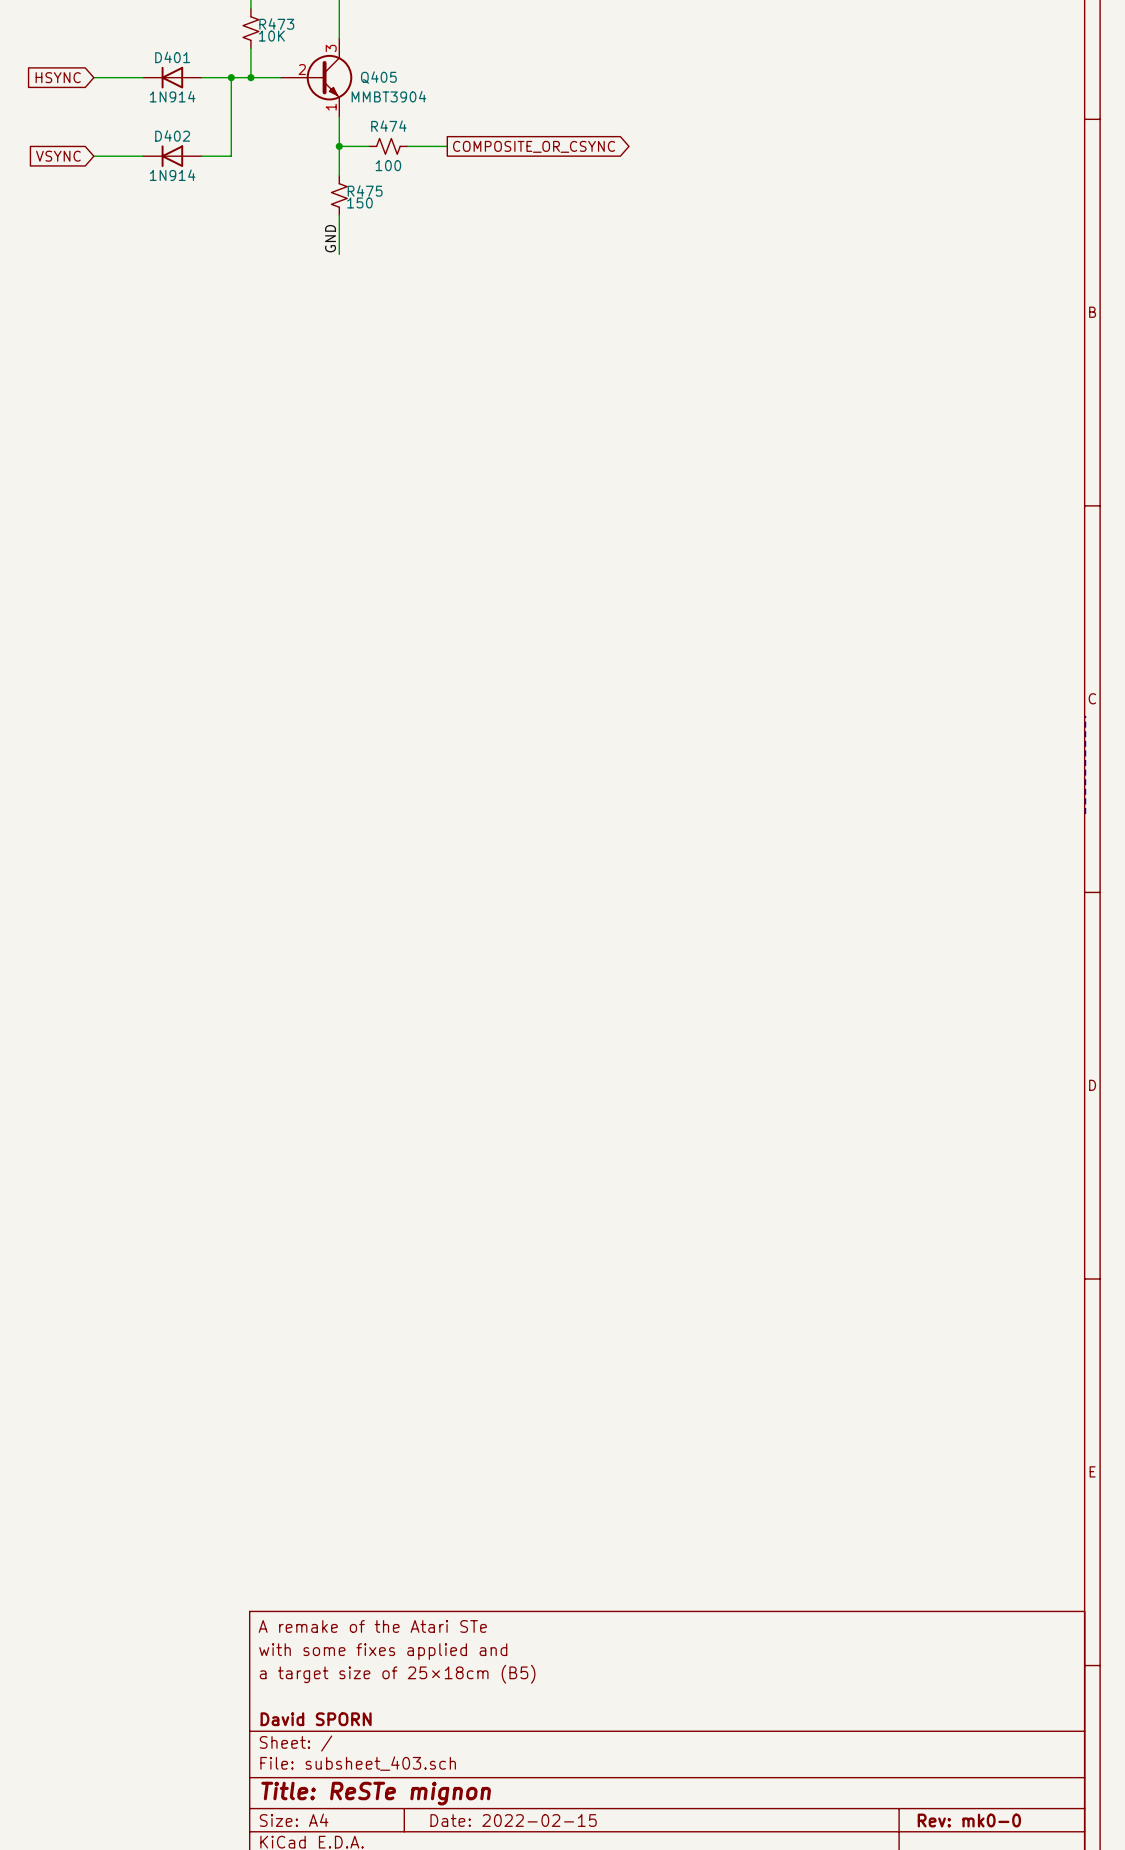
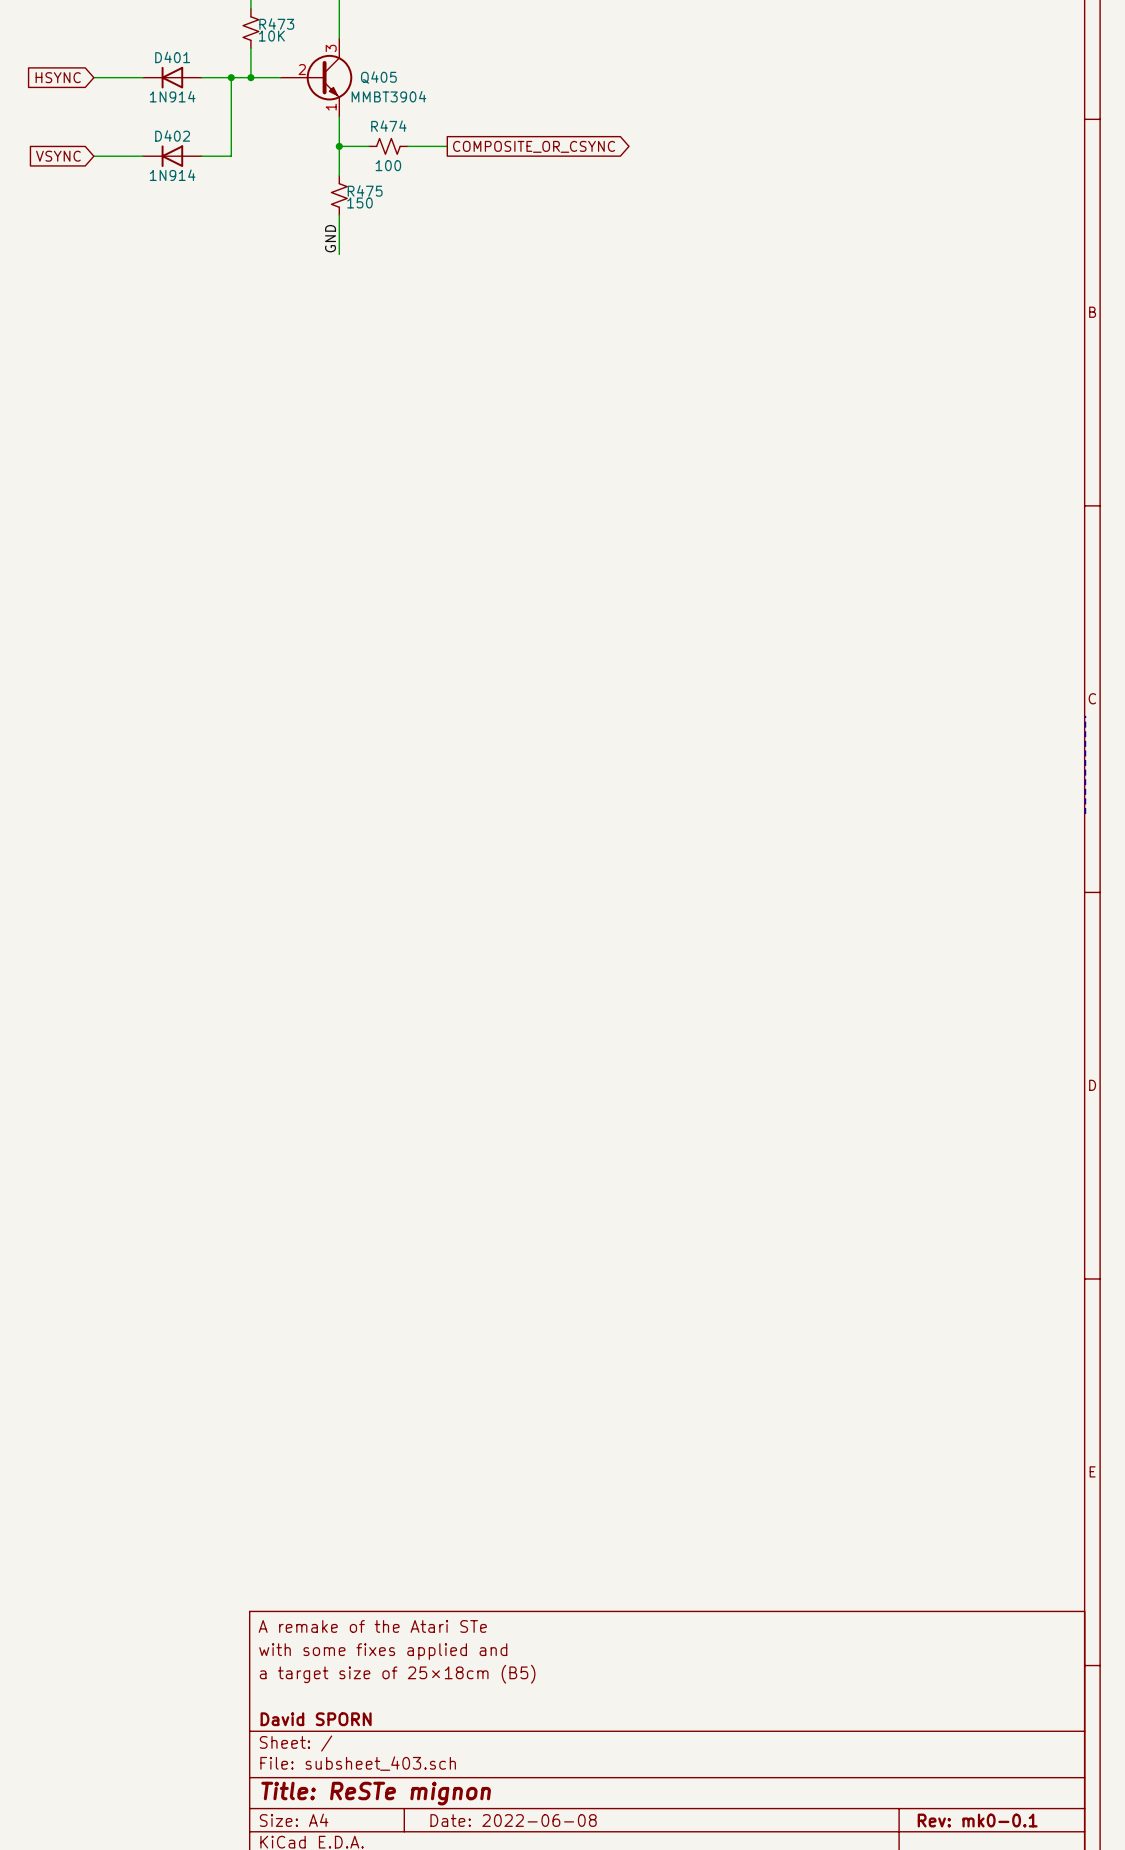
title block: Date: 2022-02-15 (513, 1820) -> Date: 2022-06-08 (513, 1820)
title block: Rev: mk0-0 (969, 1820) -> Rev: mk0-0.1 (977, 1820)

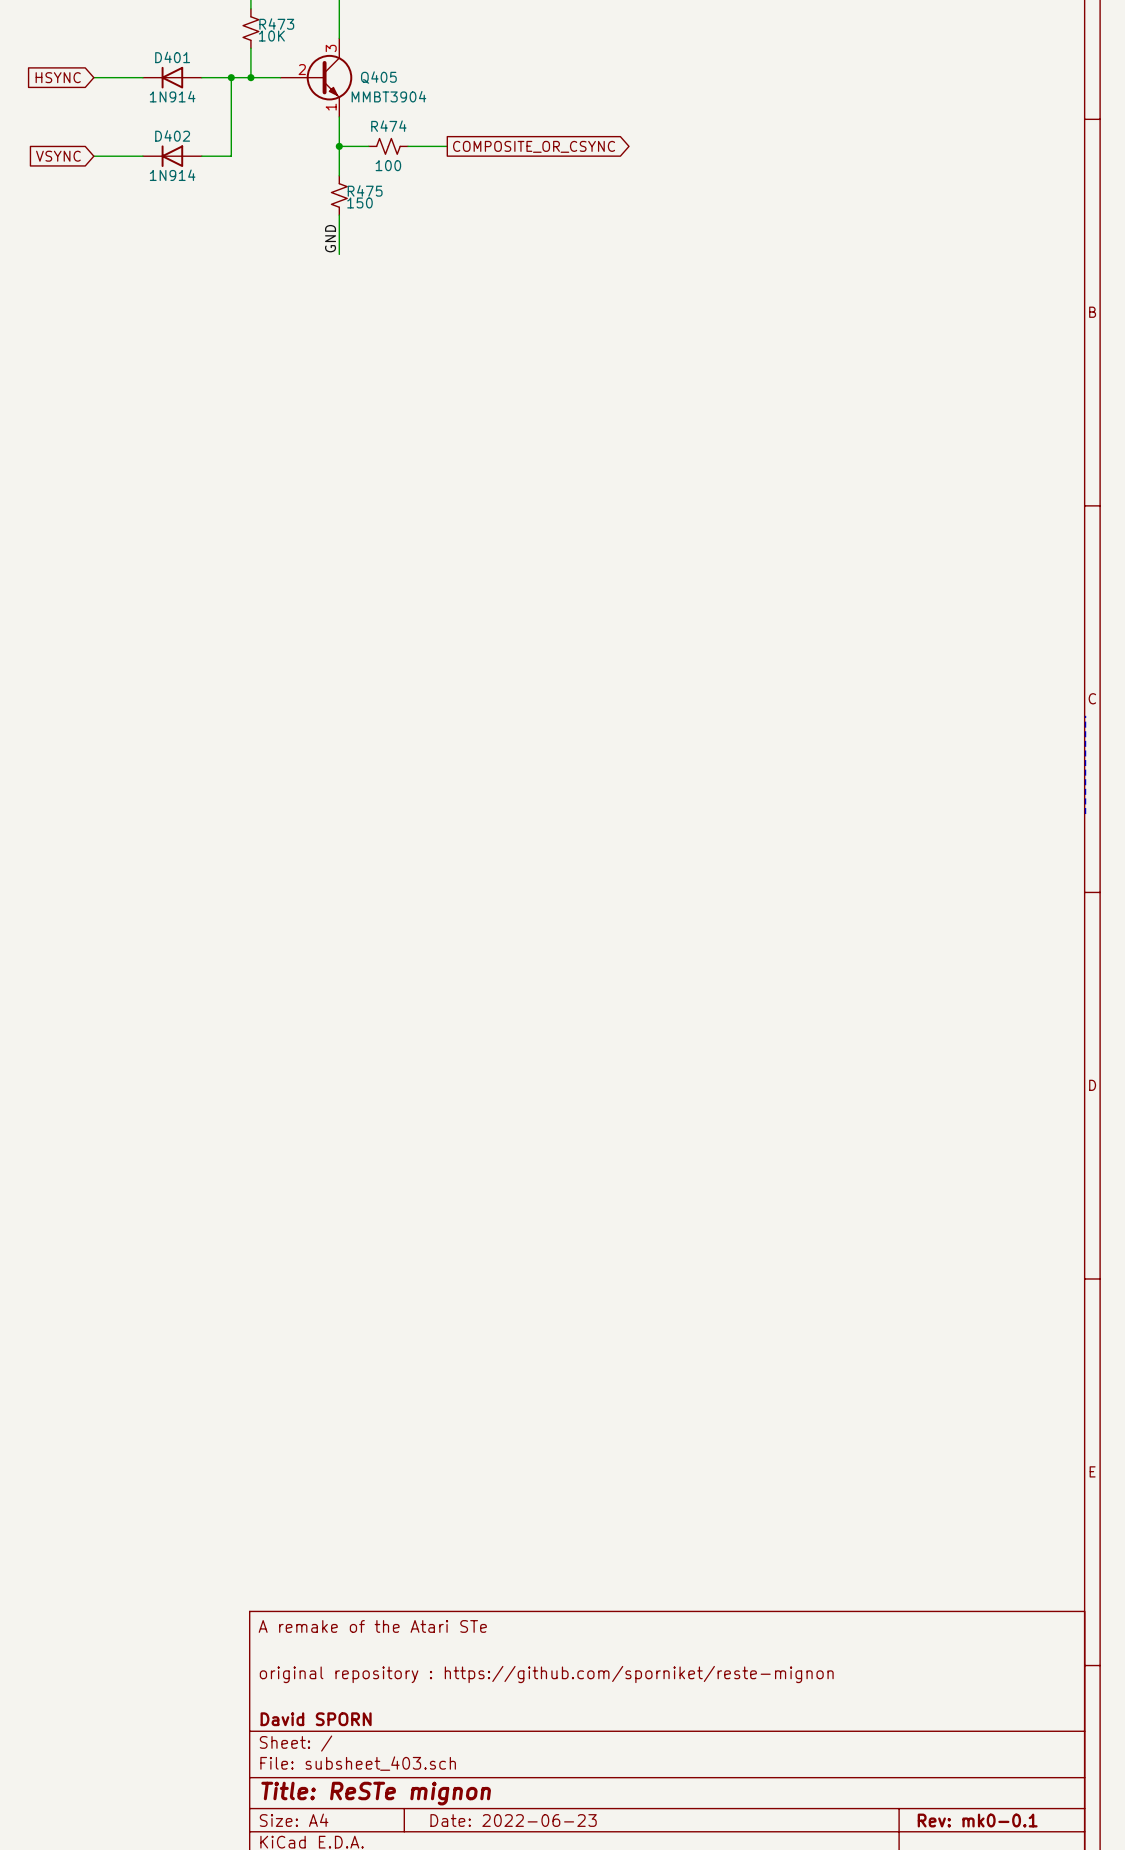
title block: with some fixes applied and (383, 1651) -> none
title block: a target size of 25×18cm (B5) (397, 1674) -> original repository : https://github.com/sporniket/reste-mignon (546, 1674)
title block: Date: 2022-06-08 (513, 1820) -> Date: 2022-06-23 (513, 1820)

